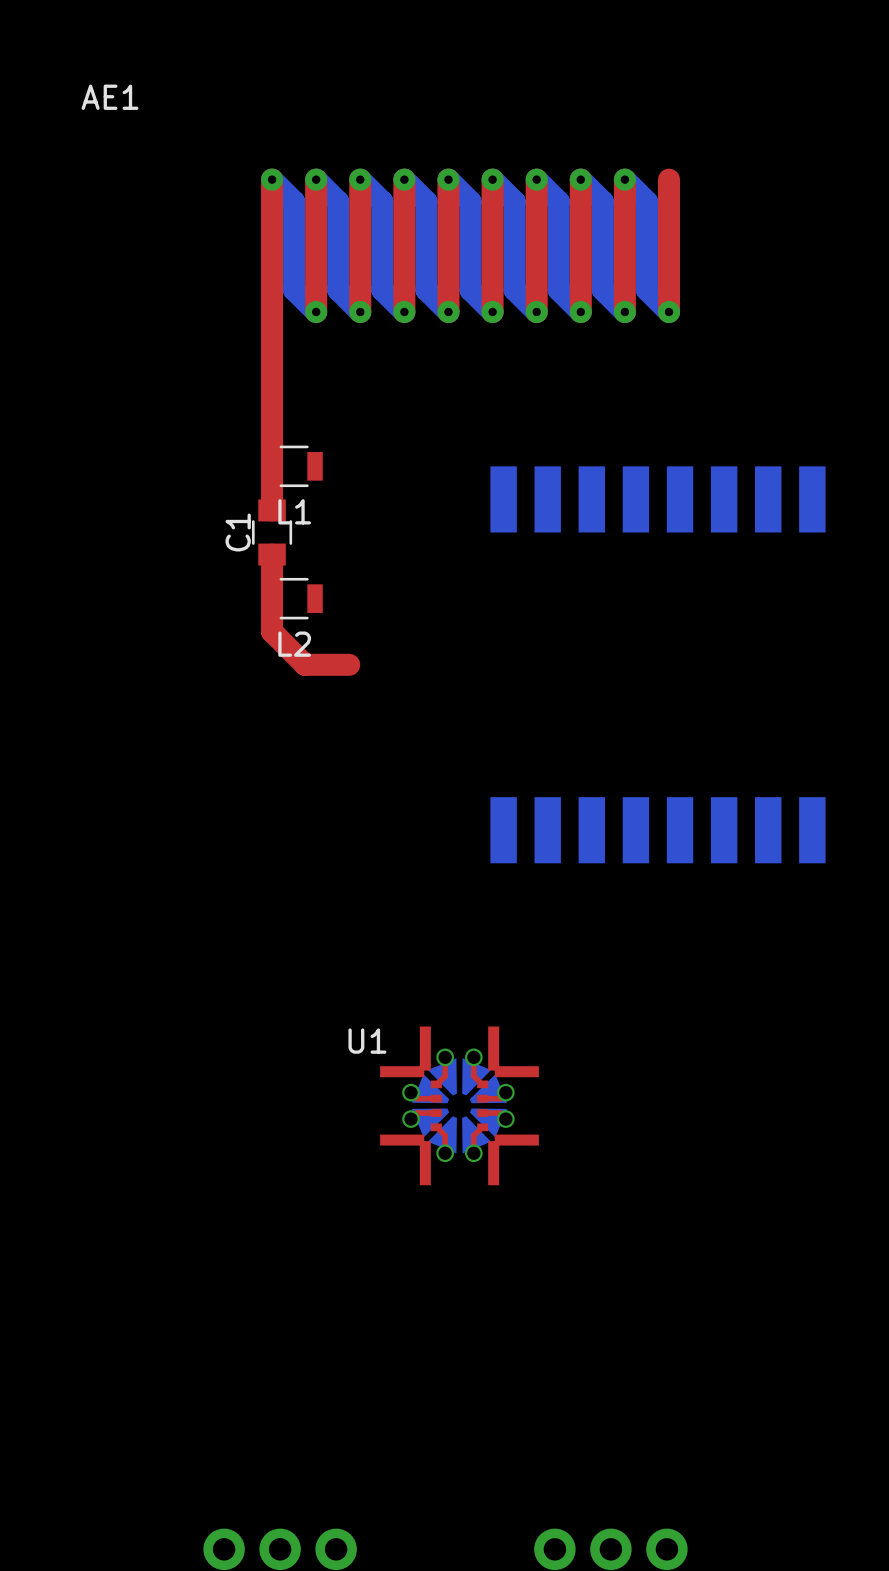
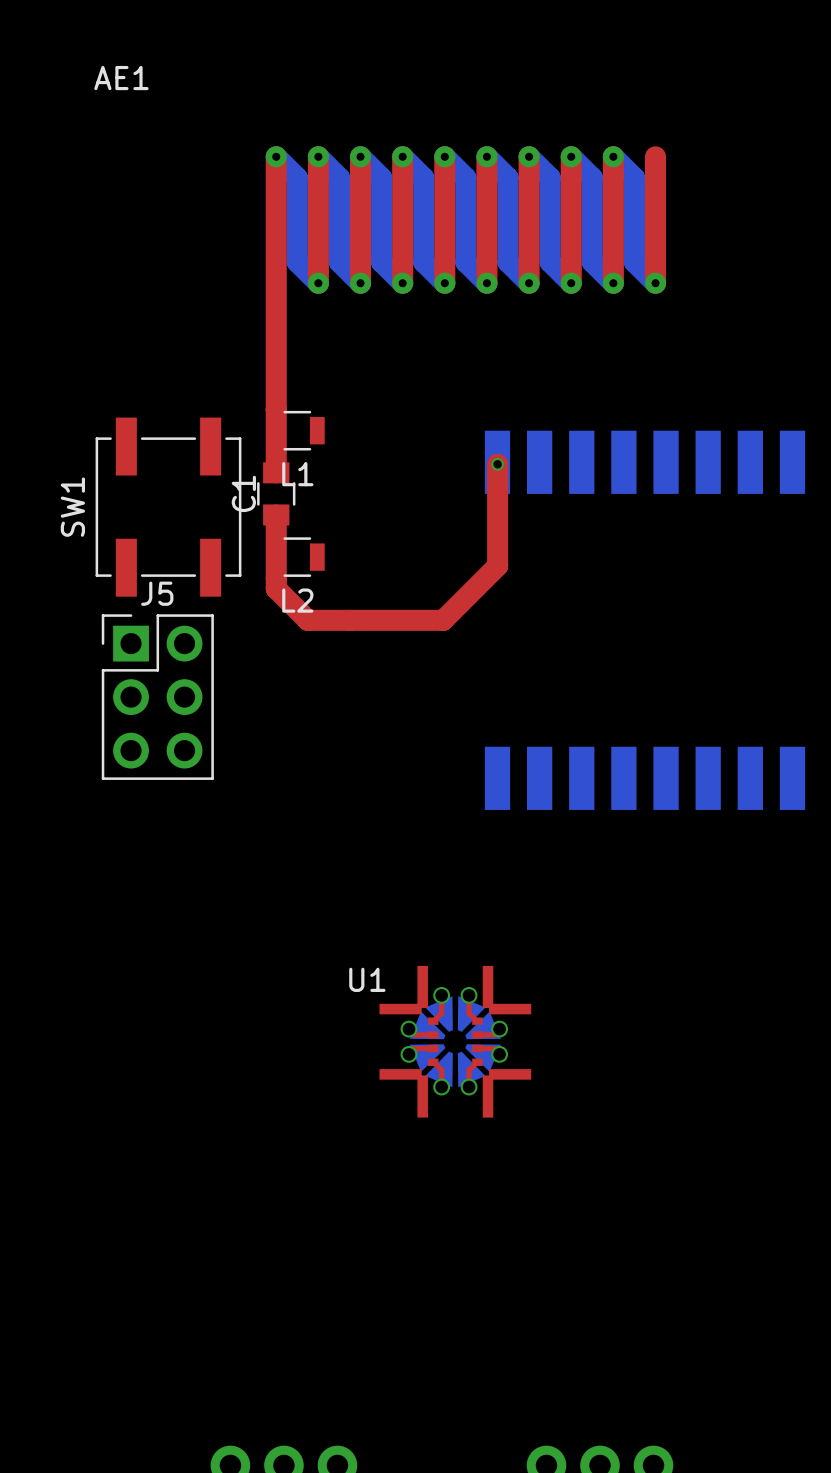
top track: none -> (497, 464) (497, 565) (443, 620) (350, 620)
via: none -> (497, 464)
SW1: none -> (168, 507)
J5: none -> (157, 697)

